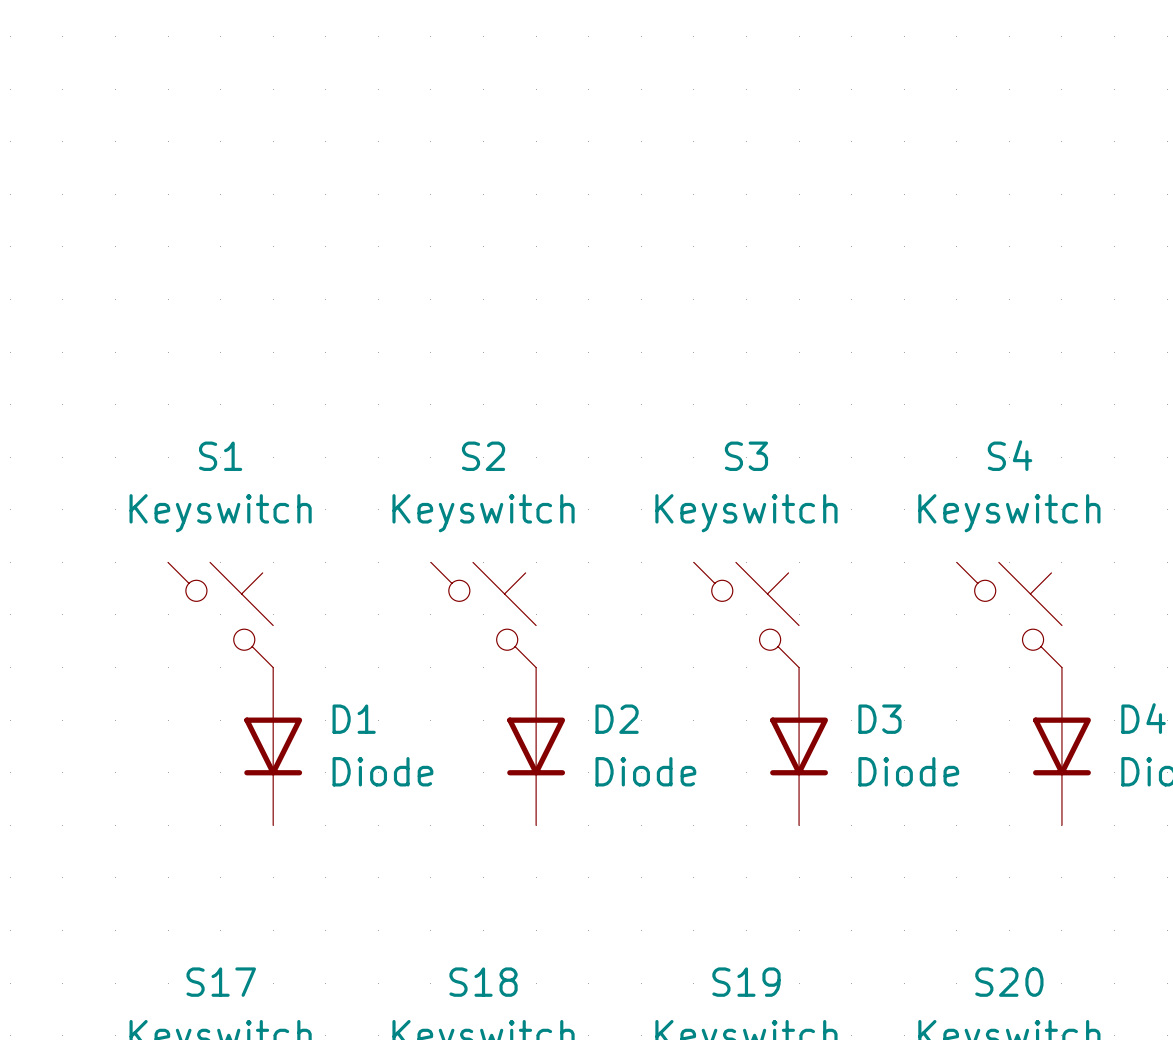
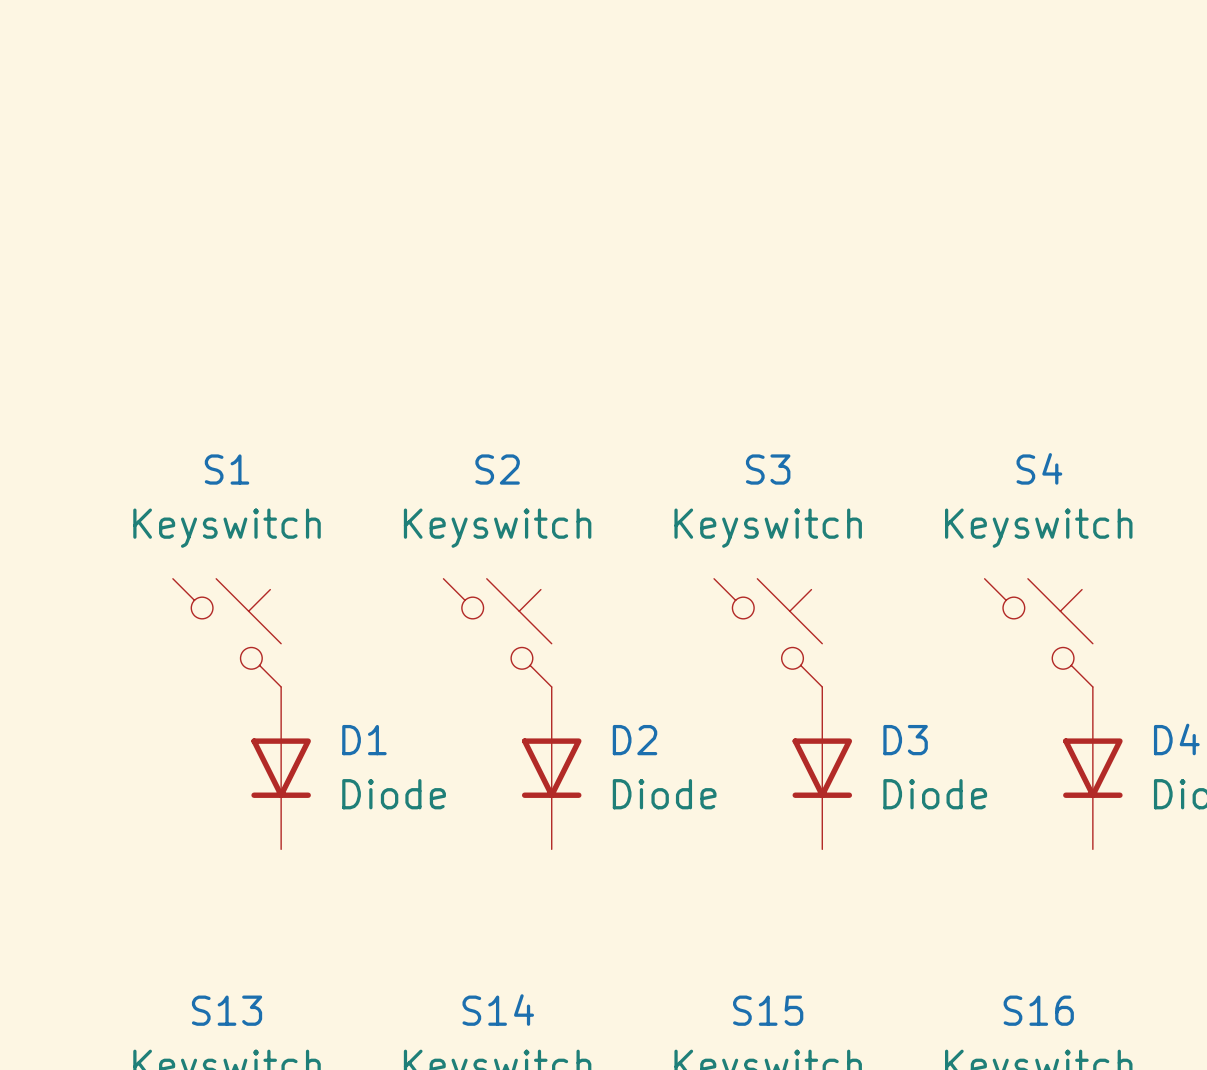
S17 name: S17 (221, 982) -> S13 (227, 1010)
S18 name: S18 (483, 982) -> S14 (498, 1010)
S19 name: S19 (746, 982) -> S15 (768, 1010)
S20 name: S20 (1009, 982) -> S16 (1038, 1010)

